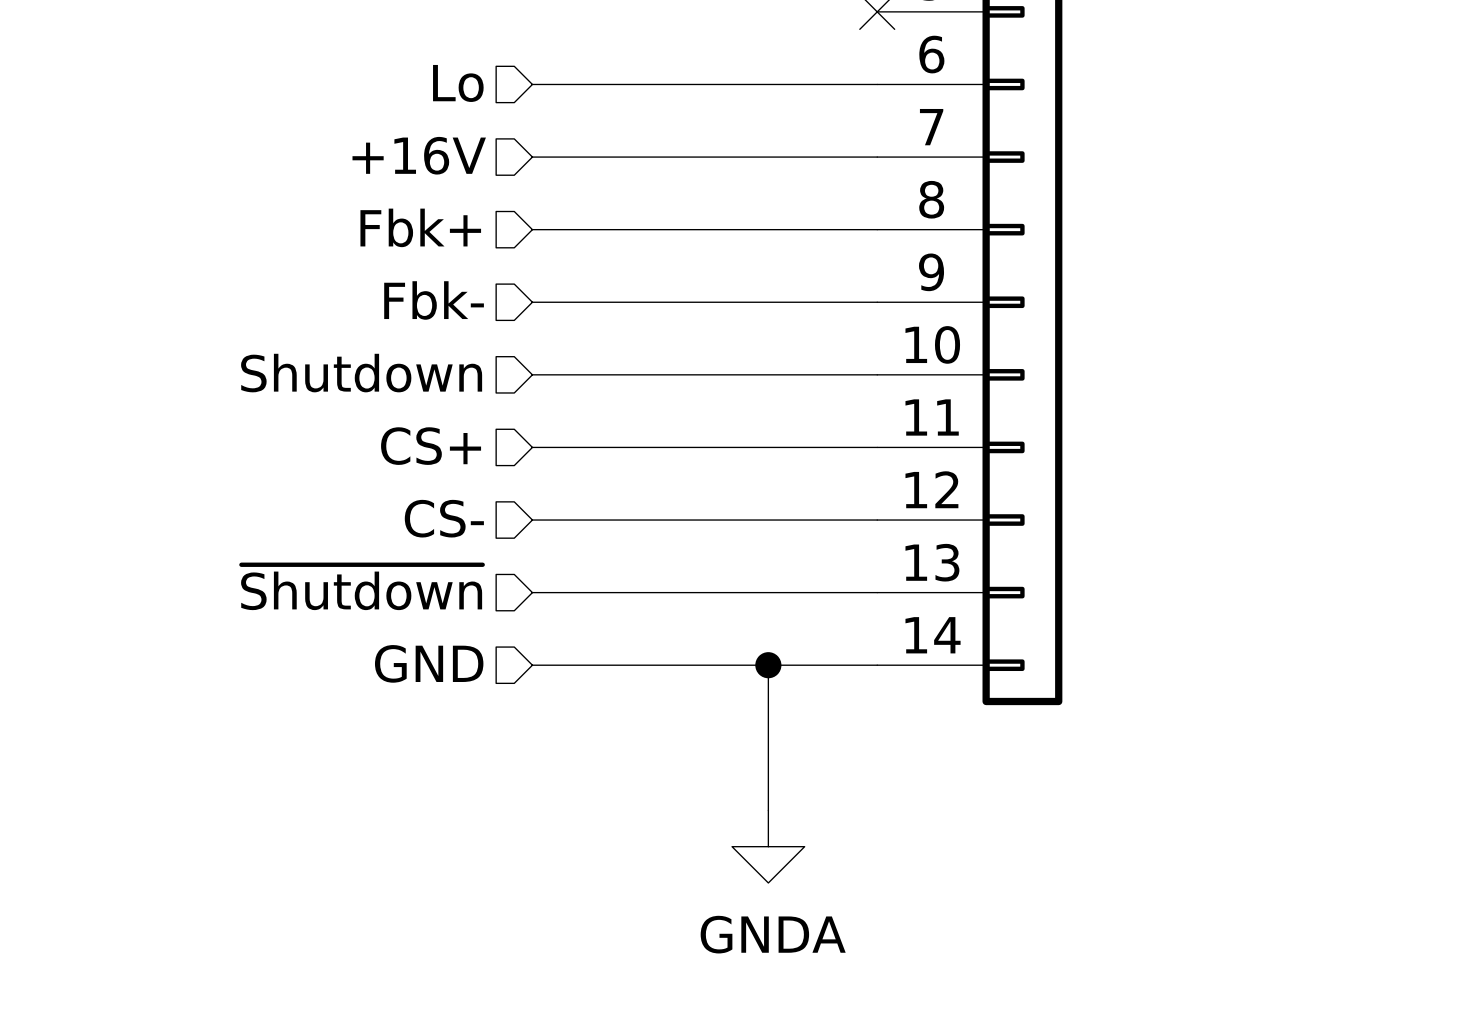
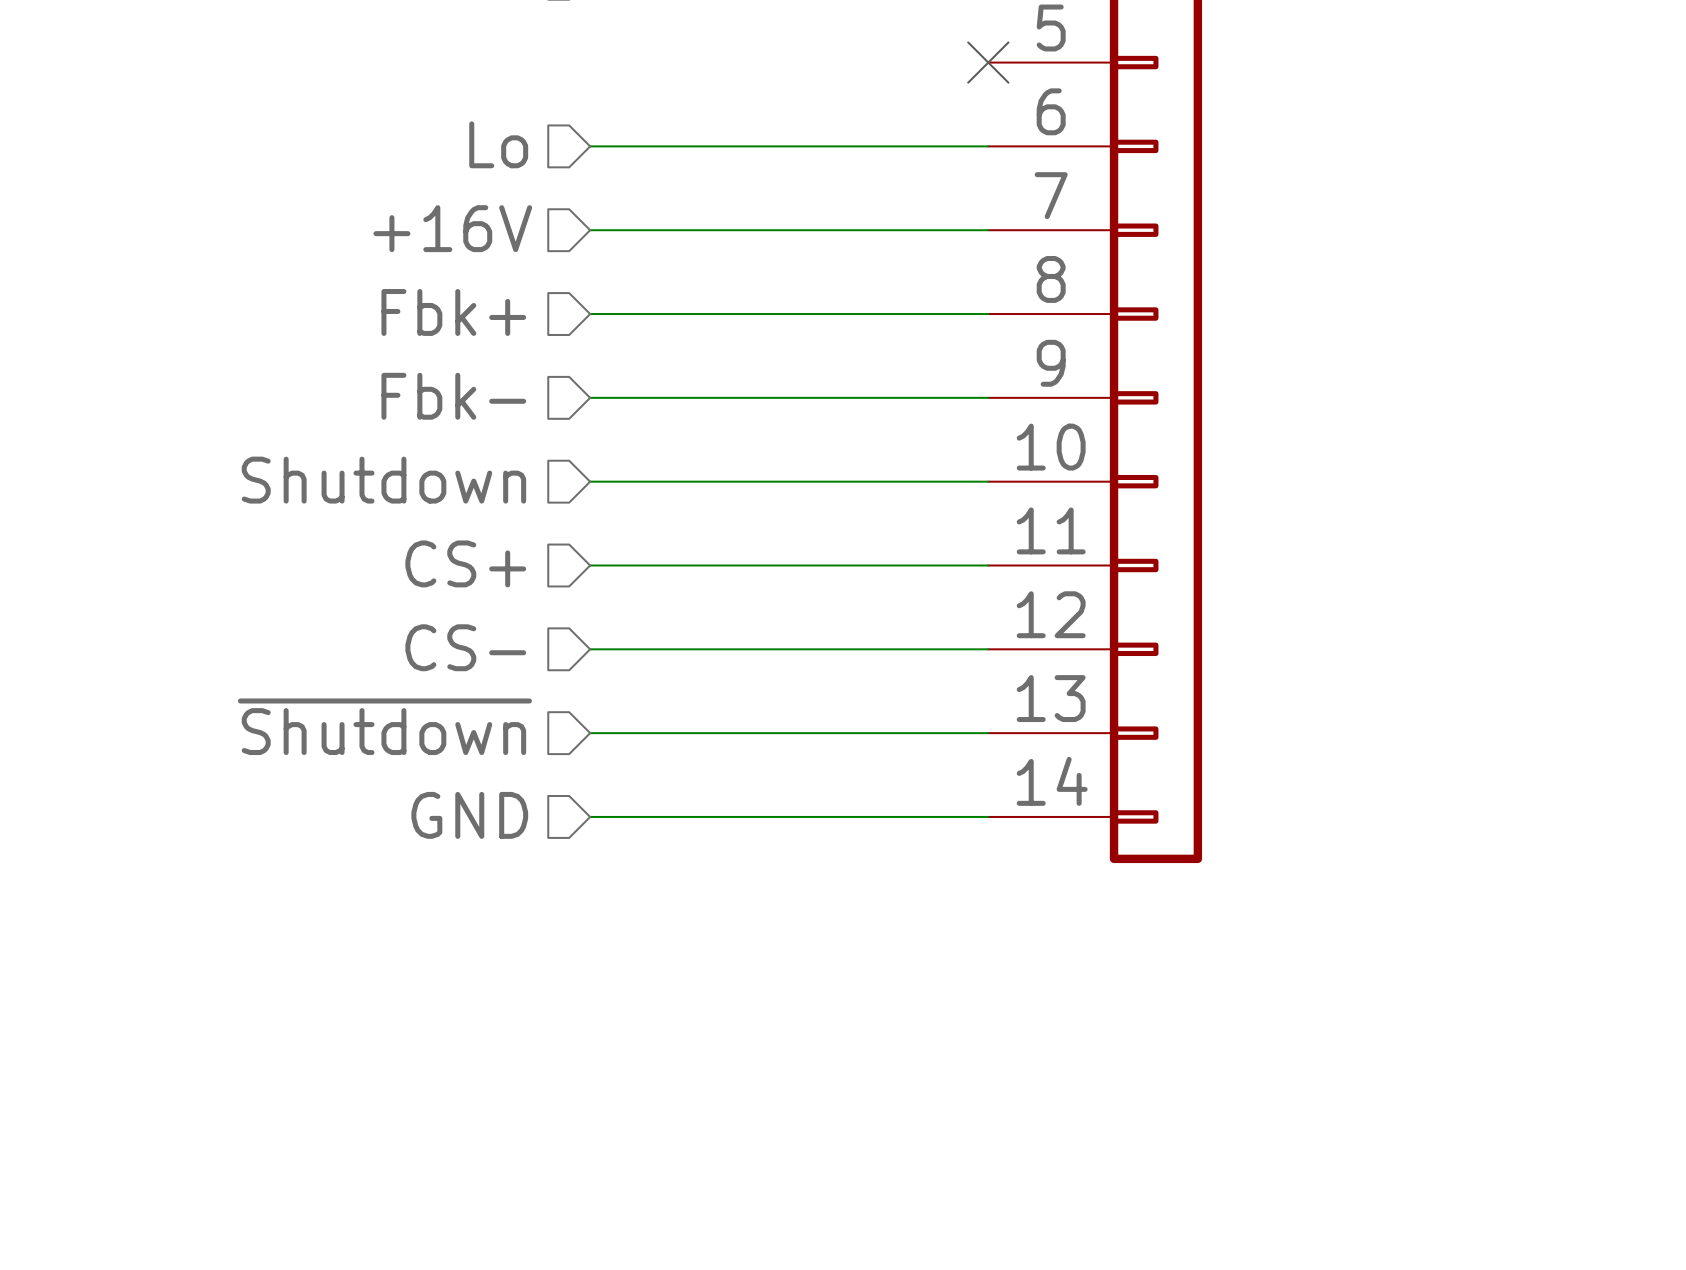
wire: (768, 665) (768, 810) -> none
junction: (768, 665) -> none
power symbol: GNDA (768, 846) -> none

